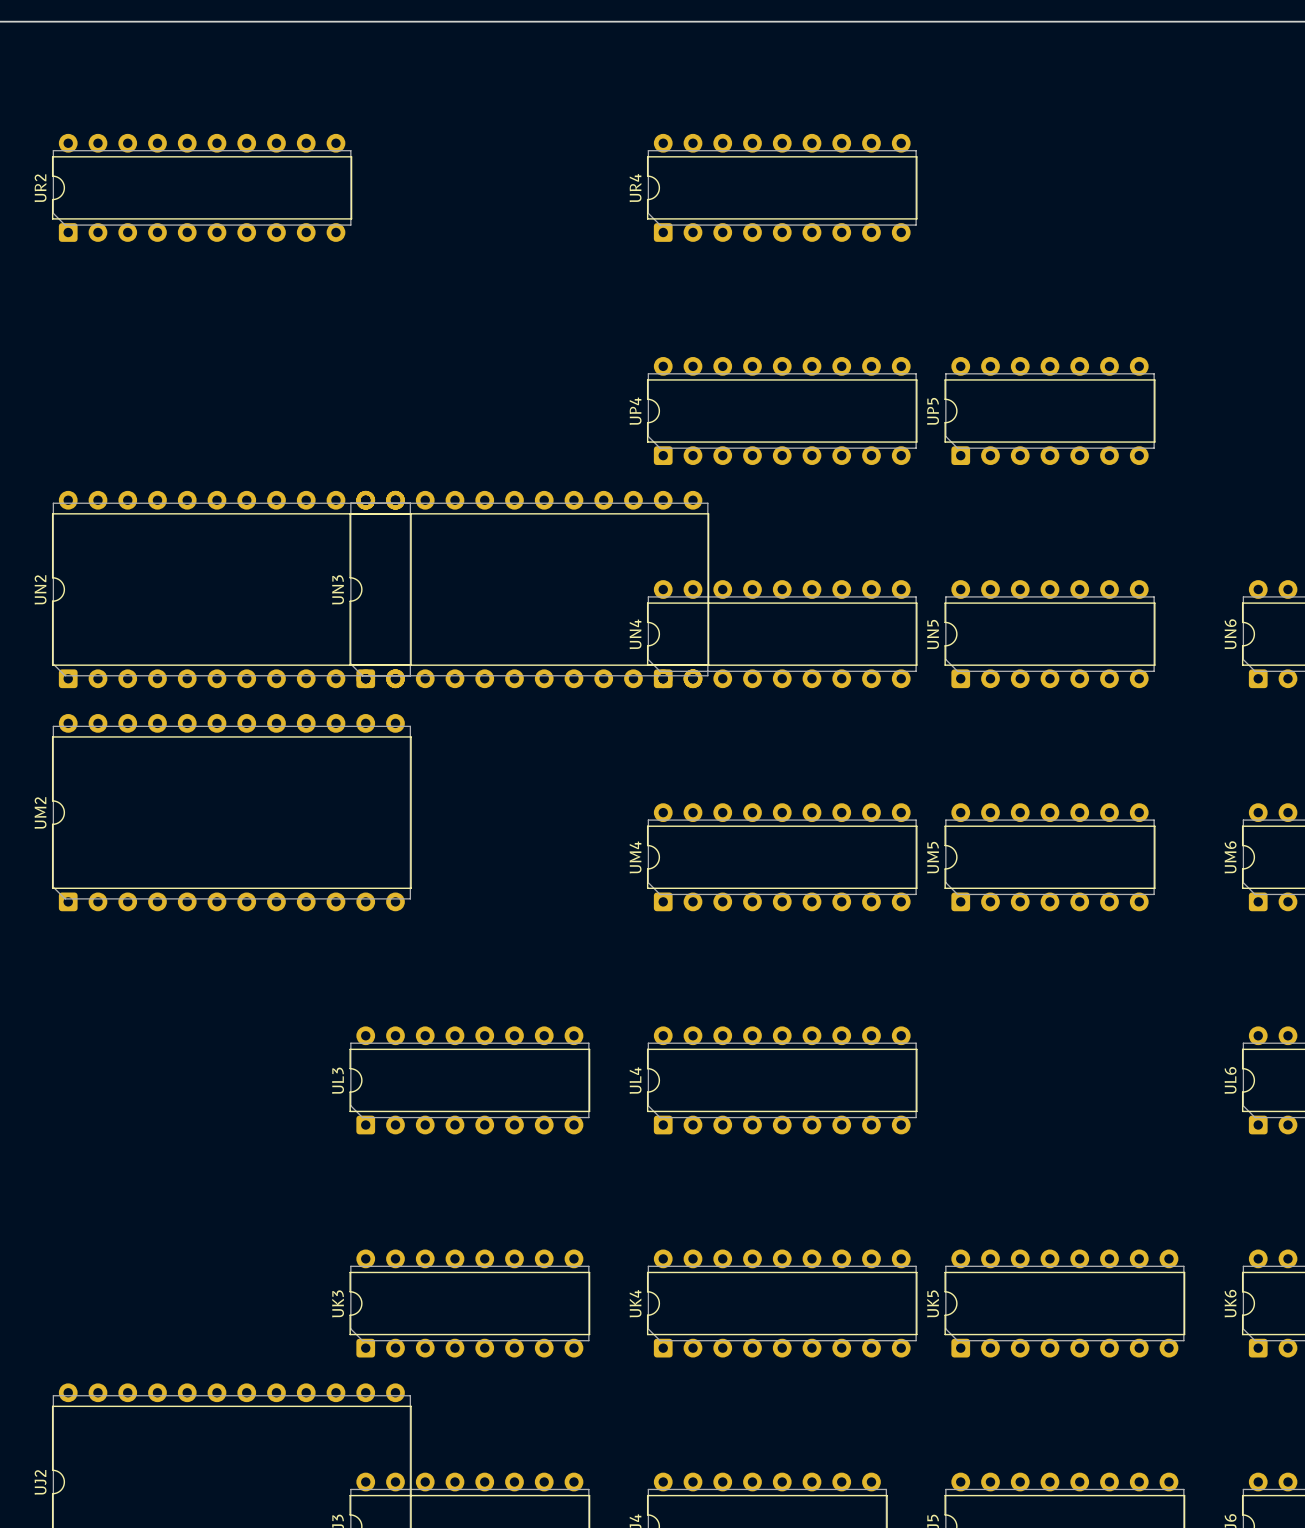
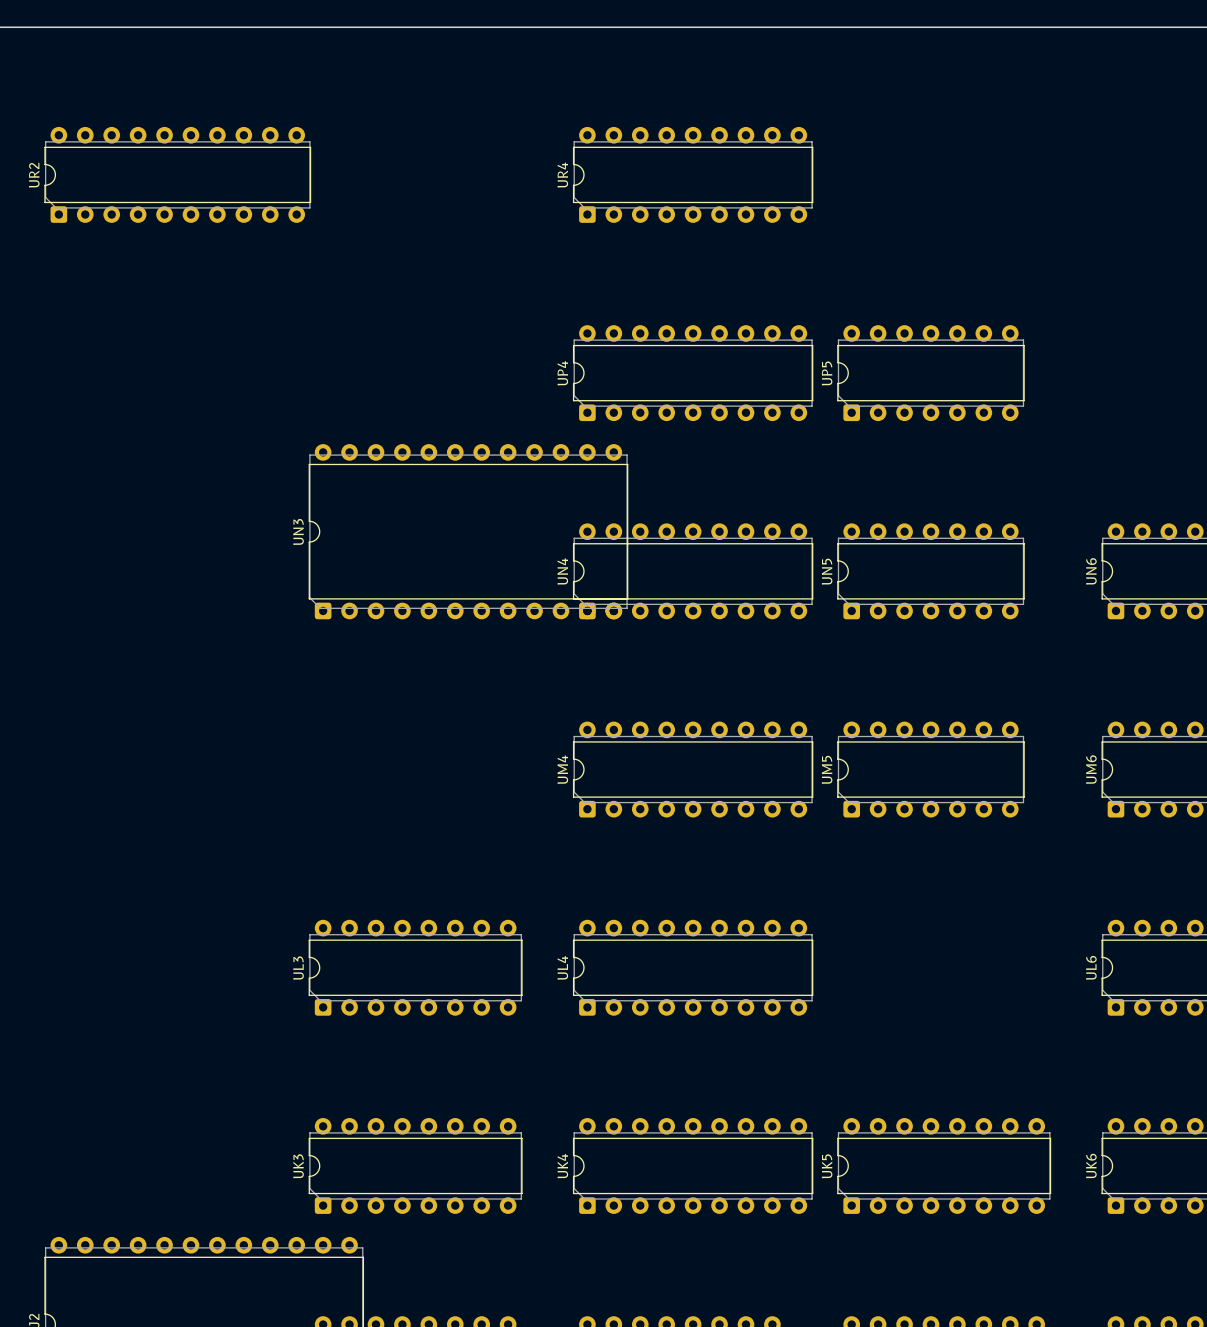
UN2: (231, 589) -> none
UM2: (231, 812) -> none

